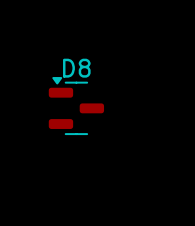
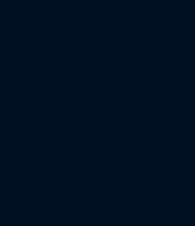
D8: (76, 106) -> none

